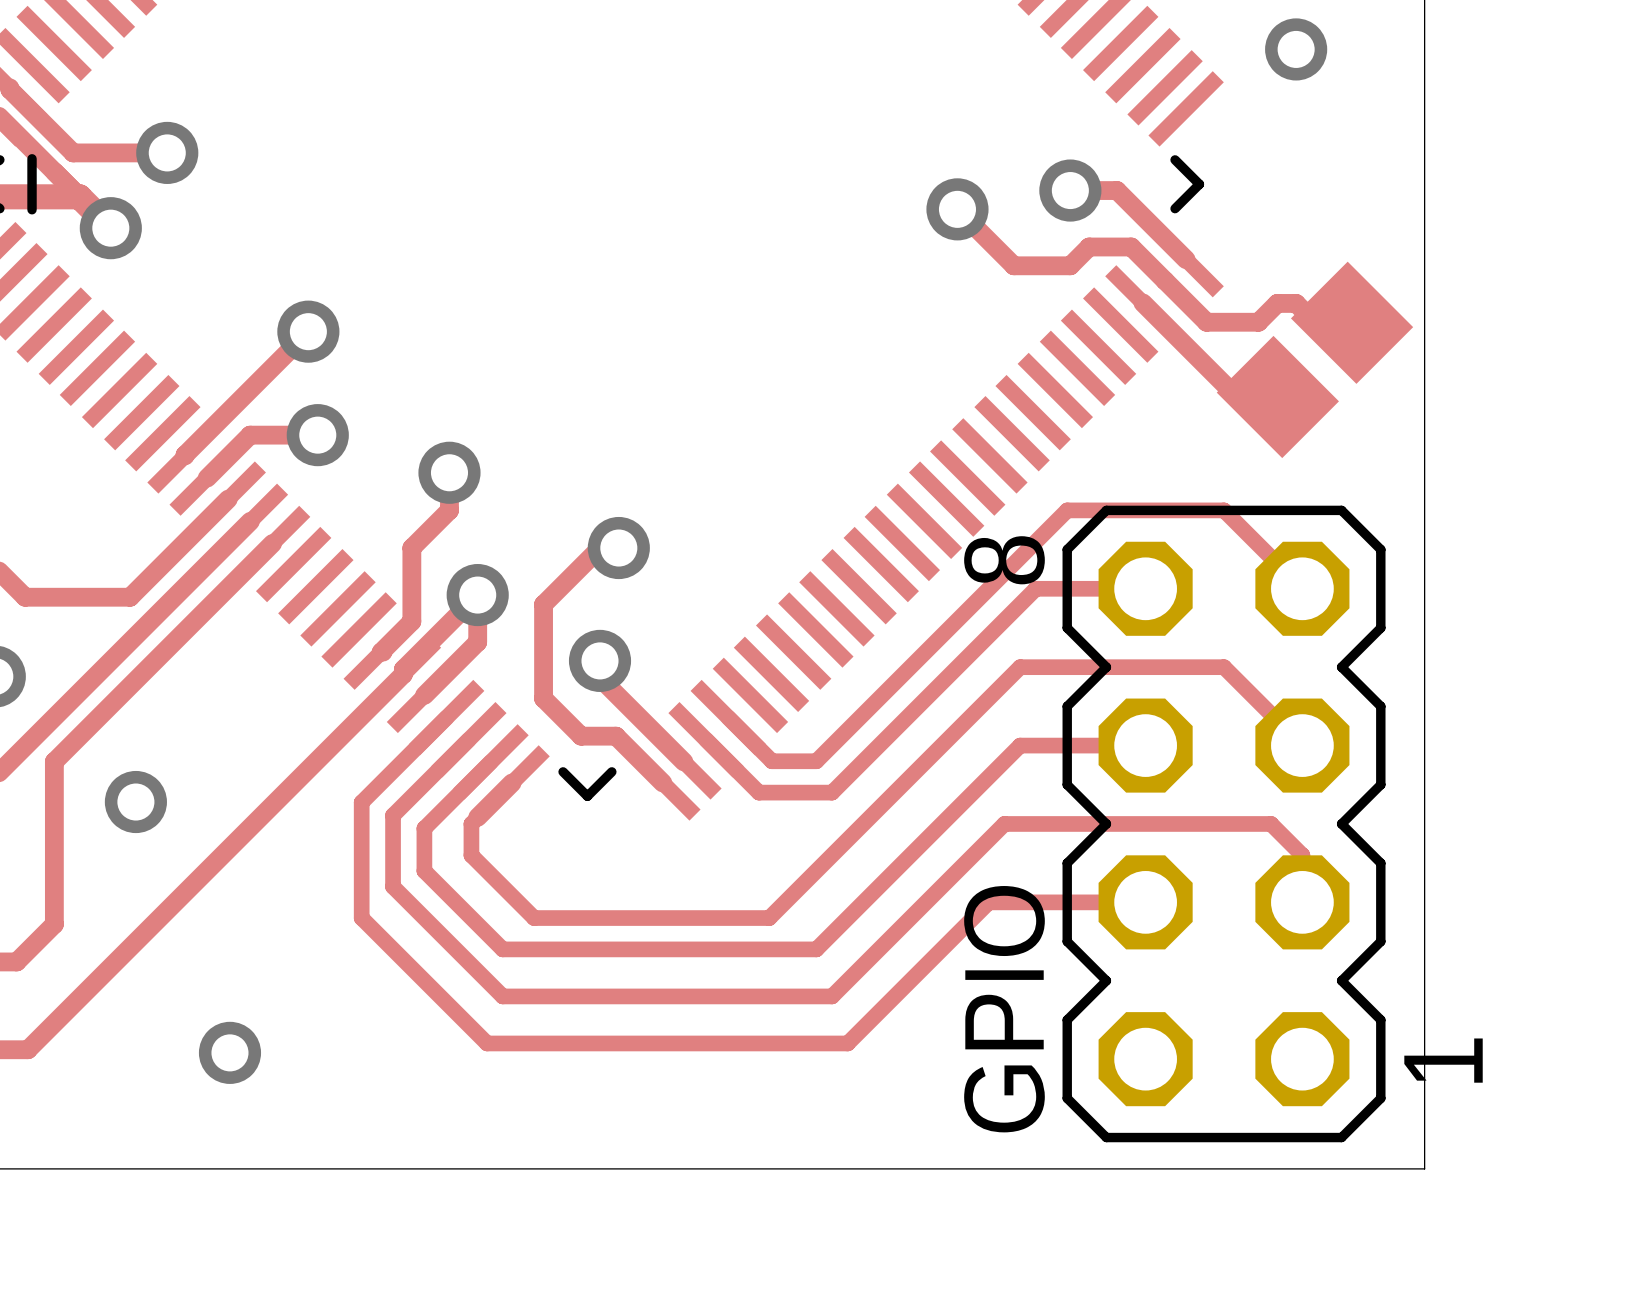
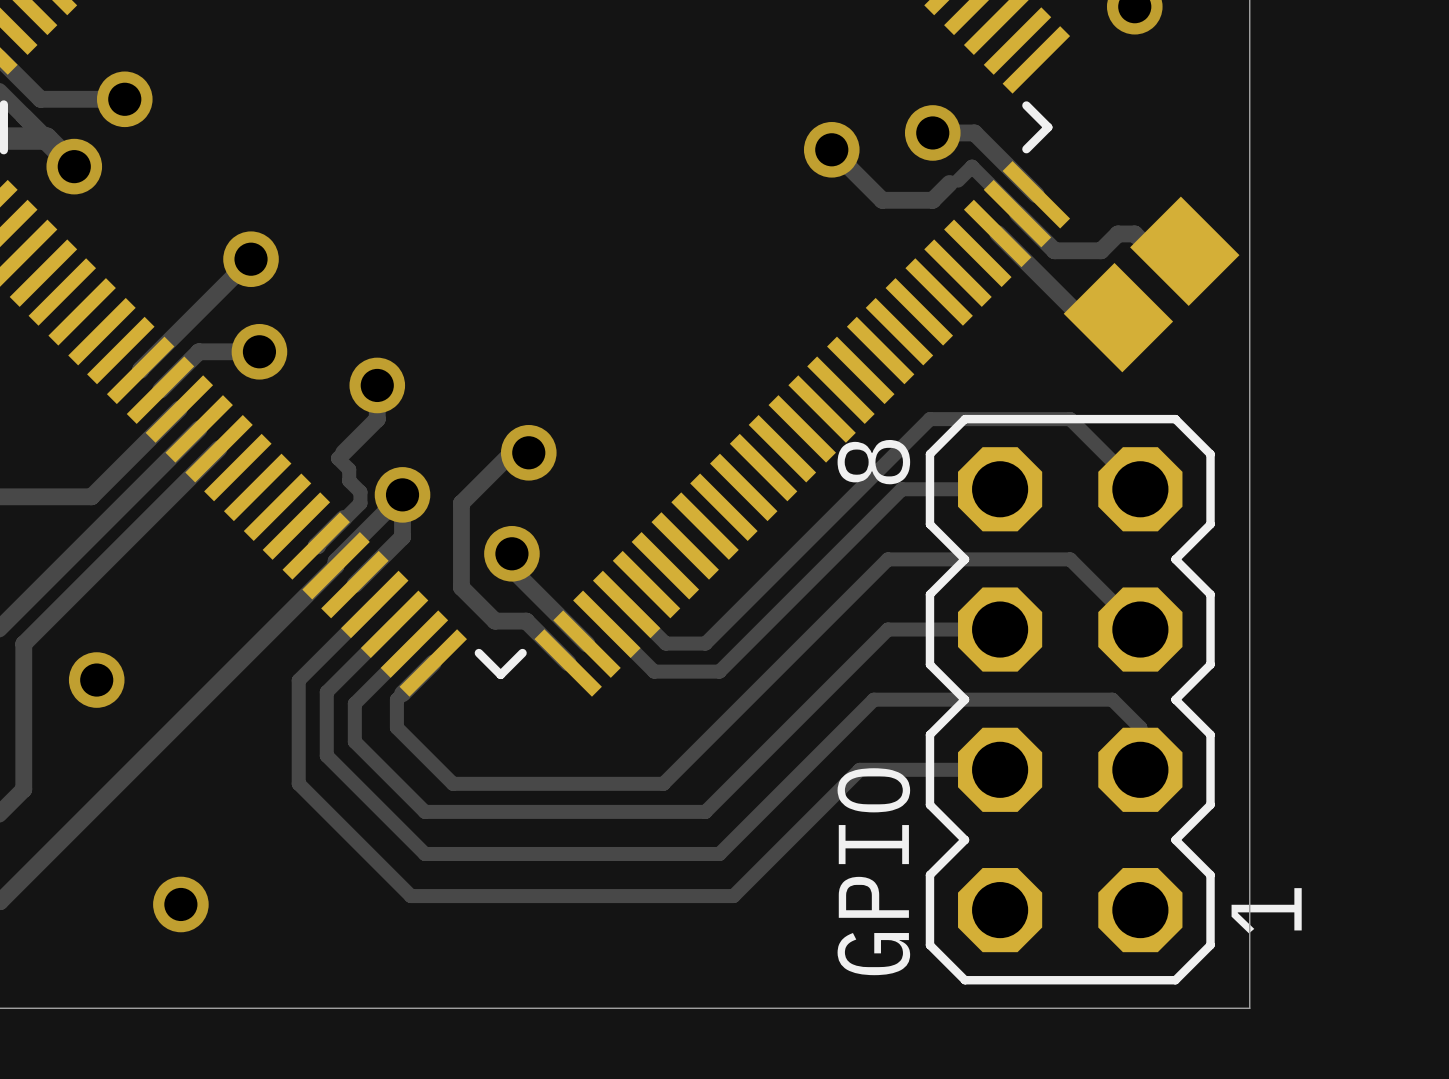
track: (1089, 246) (1131, 246) (1165, 280) -> (958, 180) (972, 166) (1017, 213)
track: (411, 548) (411, 621) -> (343, 452) (337, 458) (349, 469) (349, 480) (360, 492) (360, 503) (343, 518)

